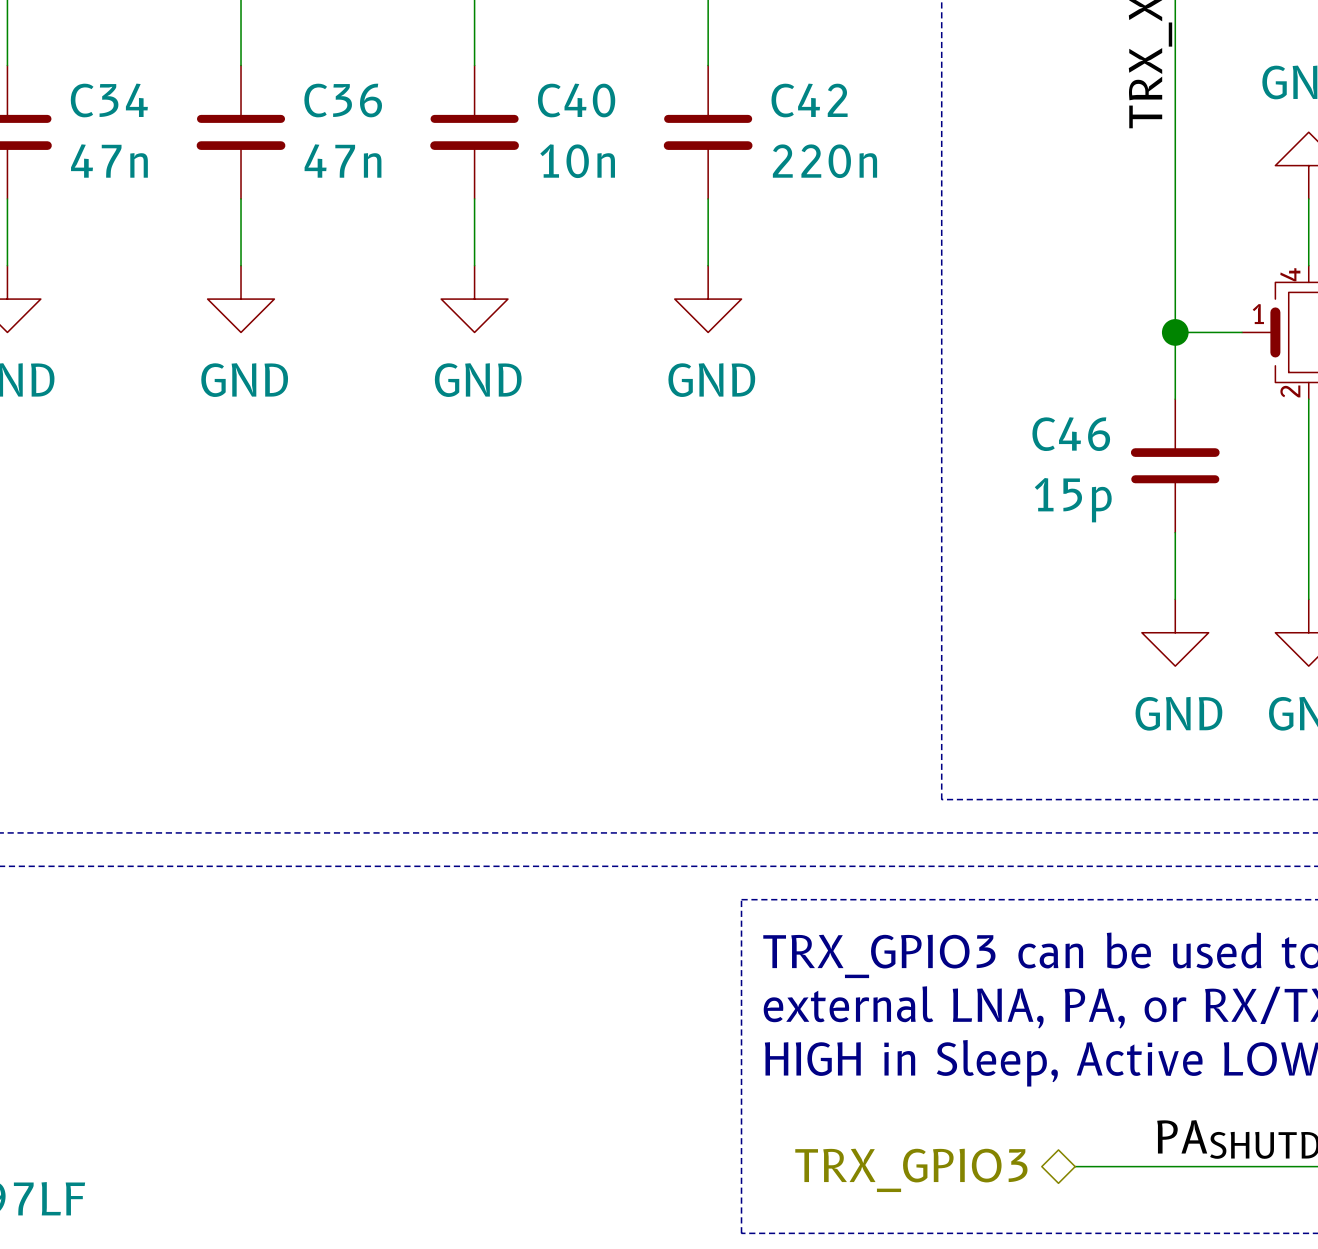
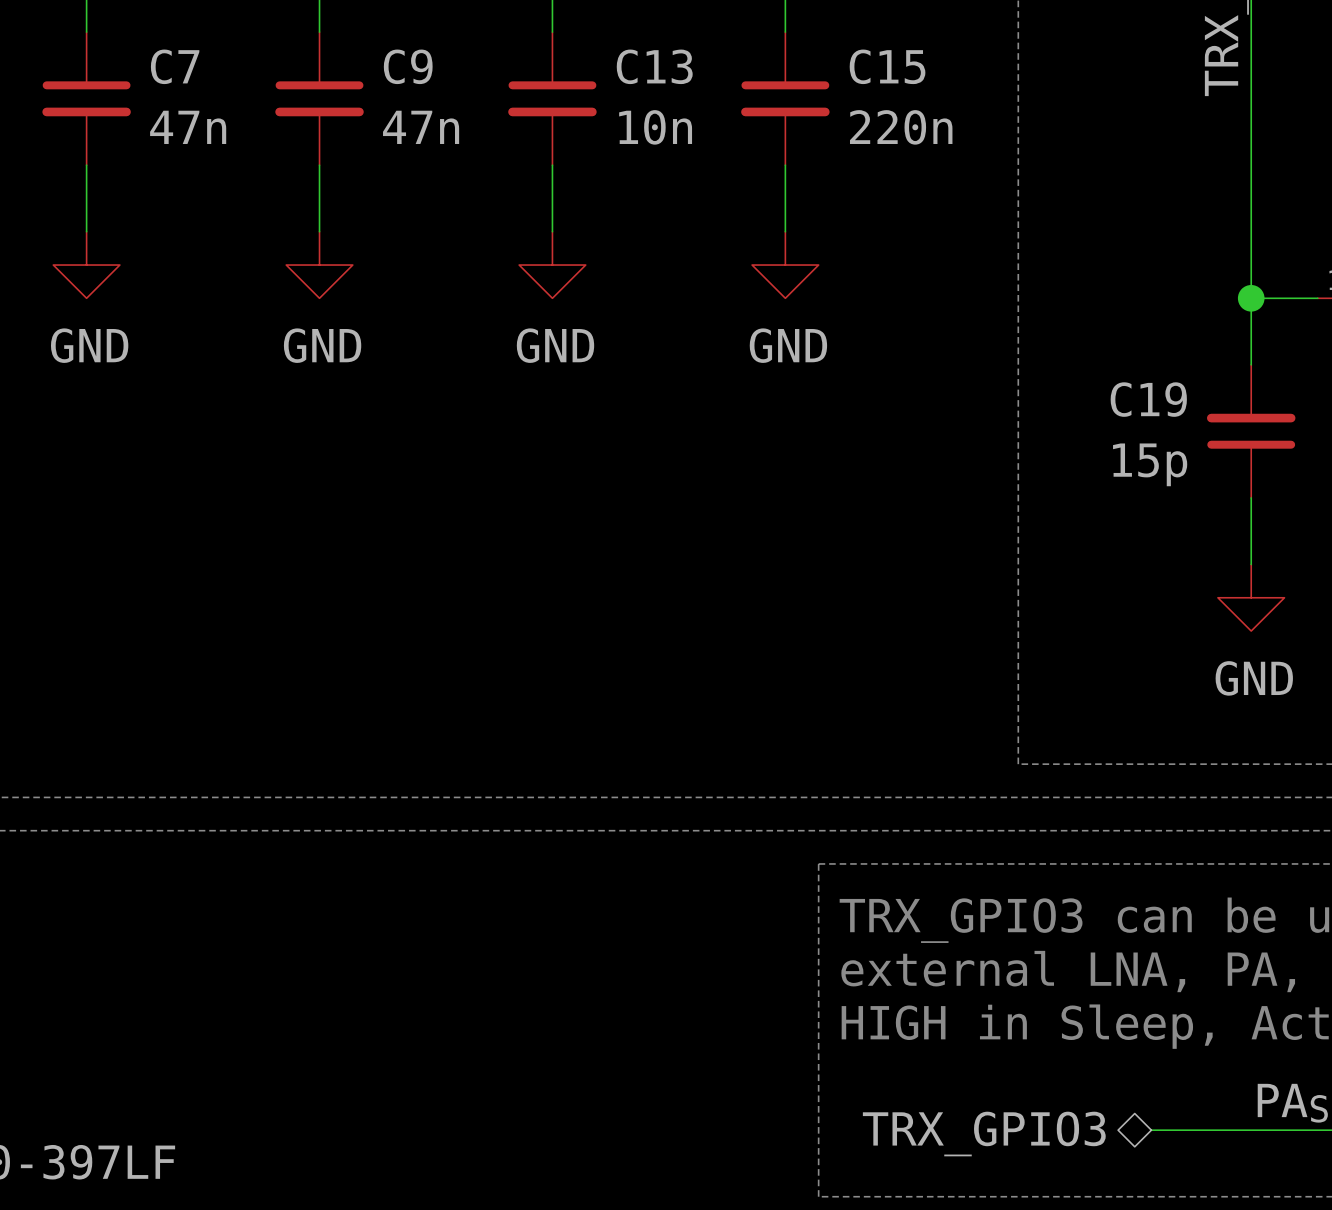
C34 name: C34 (109, 100) -> C7 (175, 66)
C36 name: C36 (343, 100) -> C9 (408, 66)
C40 name: C40 (576, 100) -> C13 (654, 66)
C42 name: C42 (809, 100) -> C15 (887, 66)
C46 name: C46 (1071, 434) -> C19 (1148, 399)

